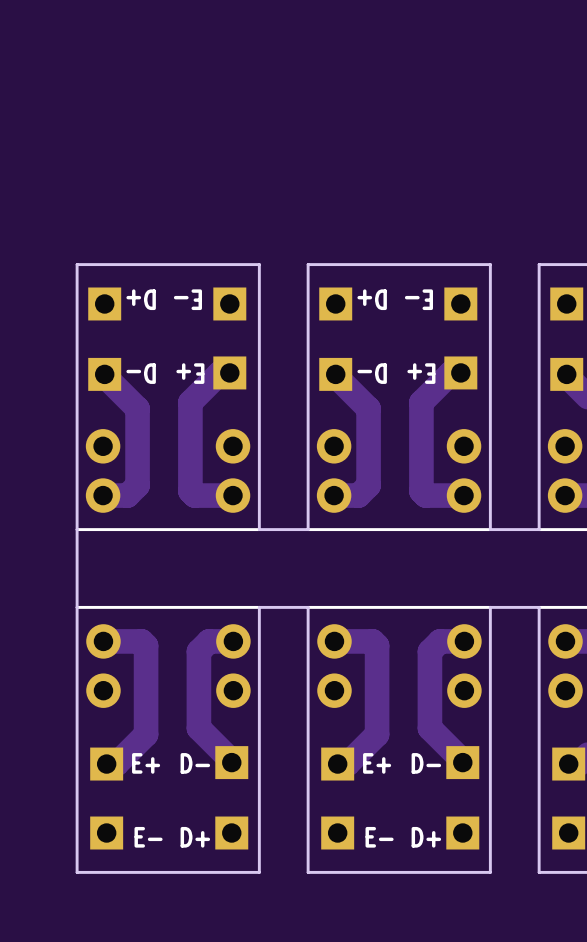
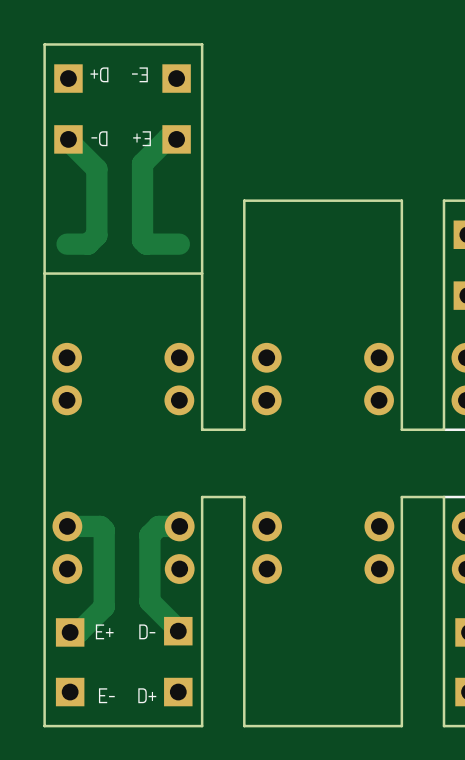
text: none -> D+ (99, 74)
text: none -> E- (139, 74)
part: none -> (68, 78)
part: none -> (176, 78)
text: none -> D- (99, 138)
text: none -> E+ (142, 138)
part: none -> (68, 139)
part: none -> (176, 139)
board edge: (77, 264) (259, 264) -> (44, 200) (44, 44) (202, 44) (202, 200)
text: D+ (141, 299) -> none
text: E- (187, 299) -> none
text: D+ (372, 299) -> none
text: E- (418, 299) -> none
part: (104, 303) -> none
part: (229, 303) -> none
part: (335, 303) -> none
part: (460, 303) -> none
board edge: none -> (44, 273) (202, 273)
track: (229, 372) (219, 372) (190, 402) (190, 491) (194, 495) (233, 495) -> (176, 138) (168, 138) (142, 163) (142, 240) (146, 244) (179, 244)
part: (229, 372) -> none
track: (460, 372) (450, 372) (421, 402) (421, 491) (425, 495) (464, 495) -> none
part: (460, 372) -> none
text: D- (141, 373) -> none
text: E+ (190, 373) -> none
text: D- (372, 373) -> none
text: E+ (421, 373) -> none
track: (104, 374) (137, 408) (137, 485) (127, 495) (103, 495) -> (68, 139) (96, 169) (96, 235) (88, 244) (67, 244)
part: (104, 374) -> none
track: (335, 374) (368, 408) (368, 485) (358, 495) (334, 495) -> none
part: (335, 374) -> none
line: (77, 529) (258, 529) -> none
line: (308, 529) (489, 529) -> none
line: (77, 607) (259, 607) -> none
line: (308, 607) (490, 607) -> none
track: (334, 641) (372, 641) (377, 645) (377, 734) (347, 764) (337, 764) -> none
track: (464, 641) (440, 641) (429, 651) (429, 728) (462, 762) -> none
part: (462, 762) -> none
text: E+ (377, 763) -> none
text: D- (426, 763) -> none
part: (337, 764) -> none
part: (337, 833) -> none
part: (462, 833) -> none
text: E- (379, 837) -> none
text: D+ (426, 837) -> none

